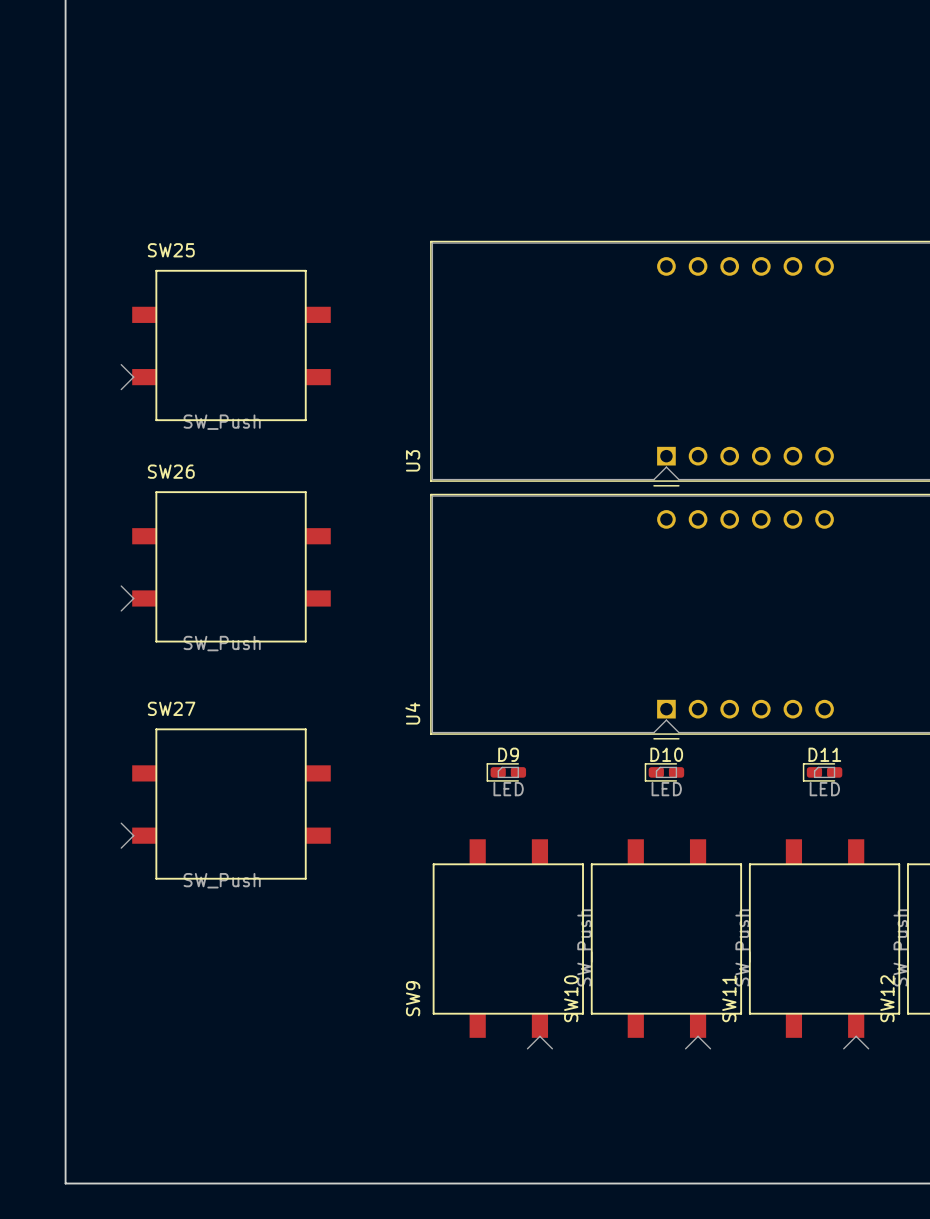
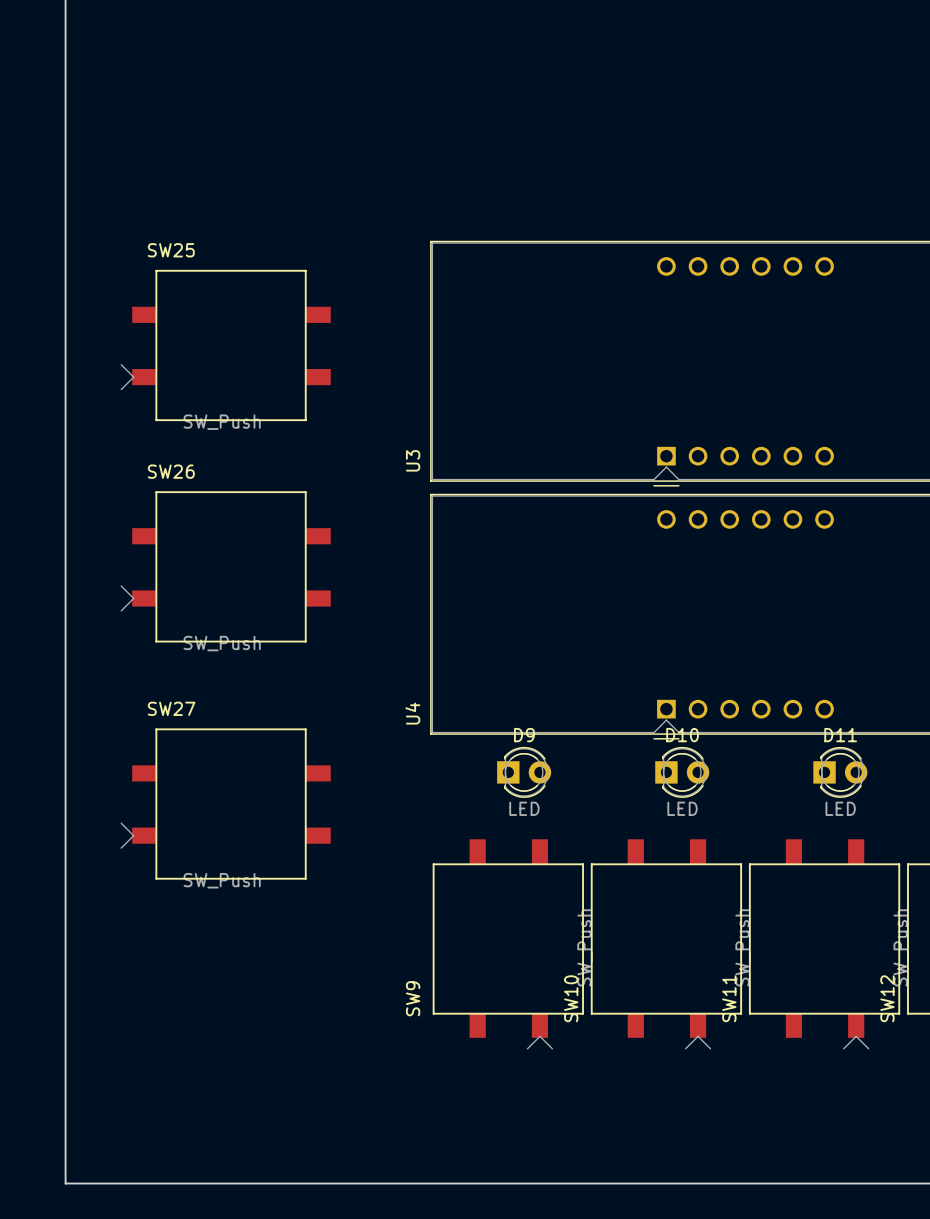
D9 footprint: [486, 763, 527, 782] -> [497, 746, 552, 798]
D10 footprint: [644, 763, 685, 782] -> [655, 746, 710, 798]
D11 footprint: [802, 763, 843, 782] -> [813, 746, 868, 798]

